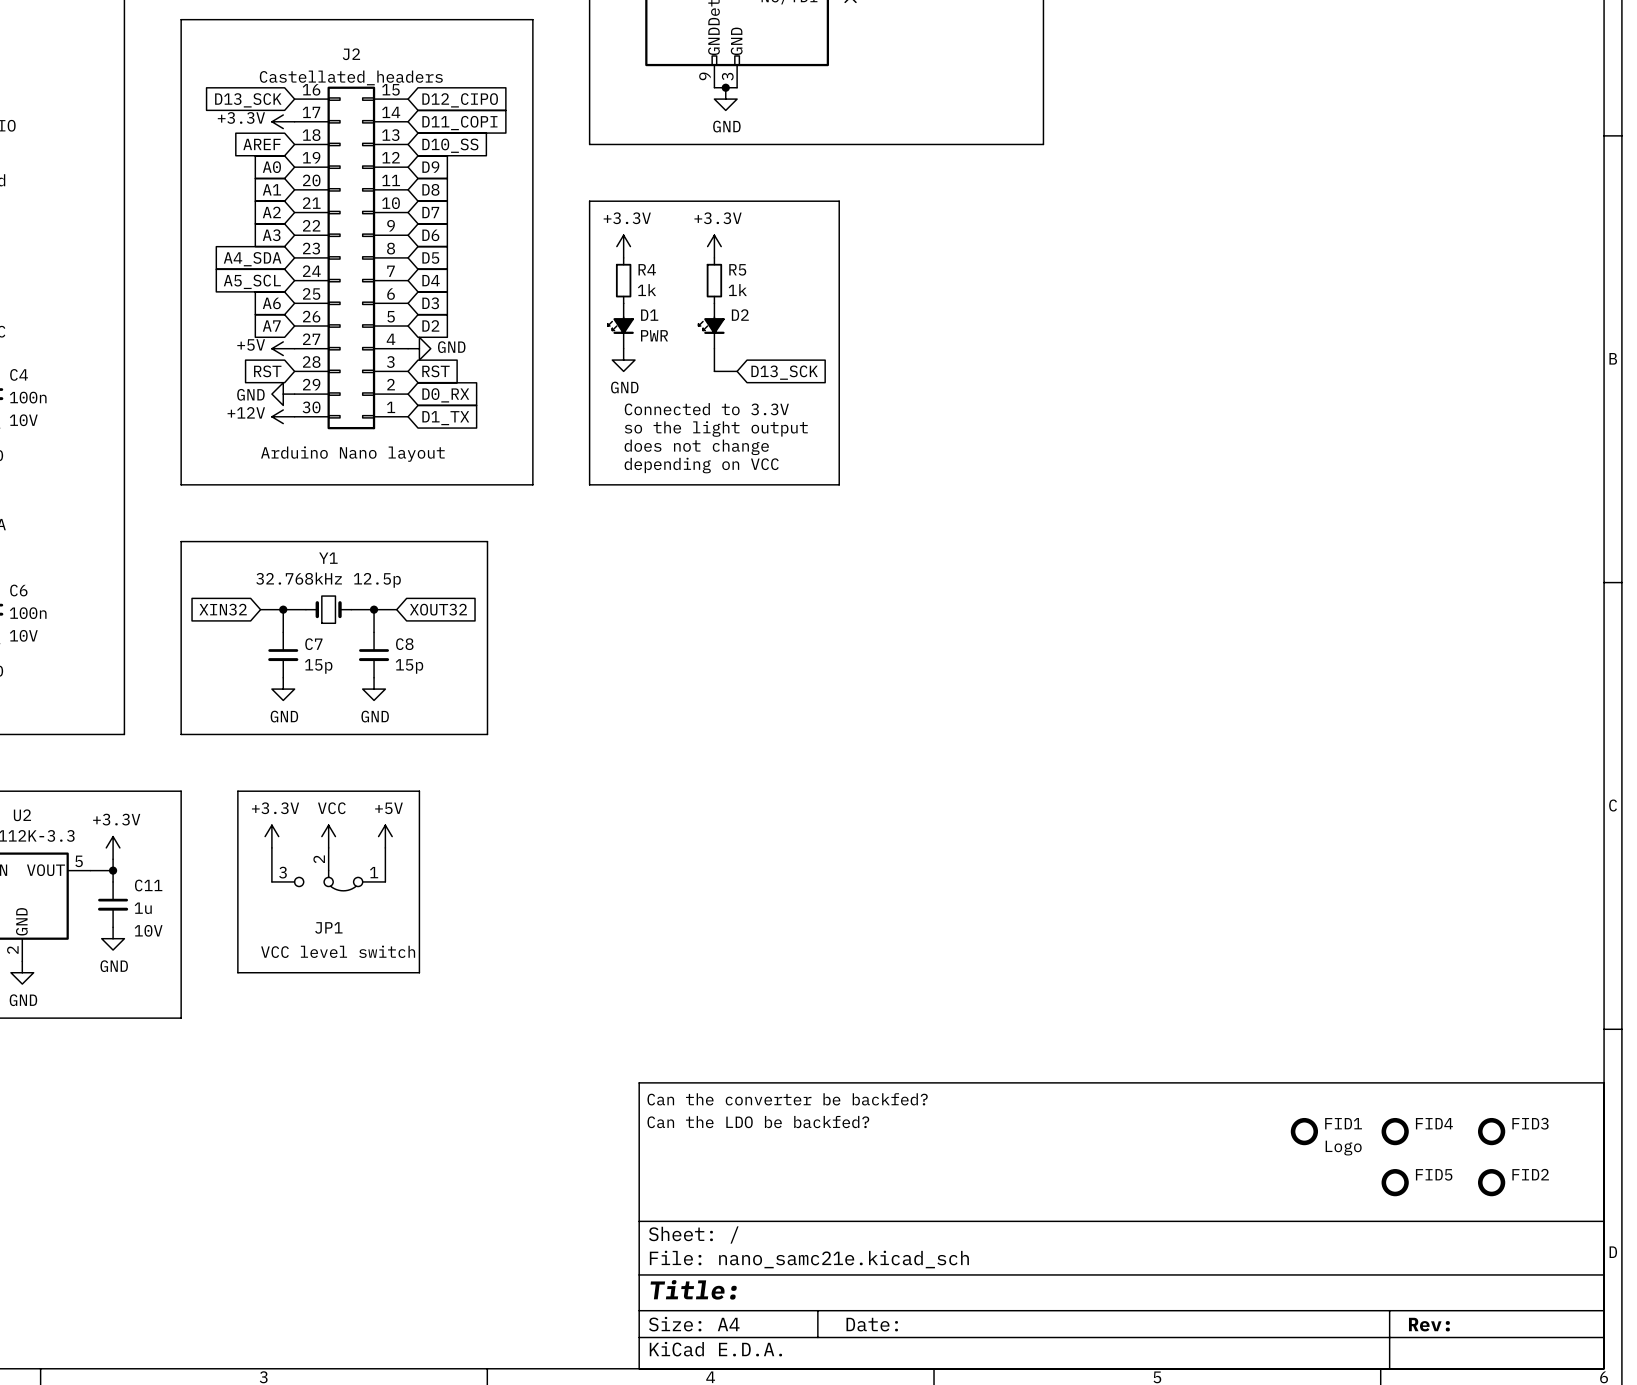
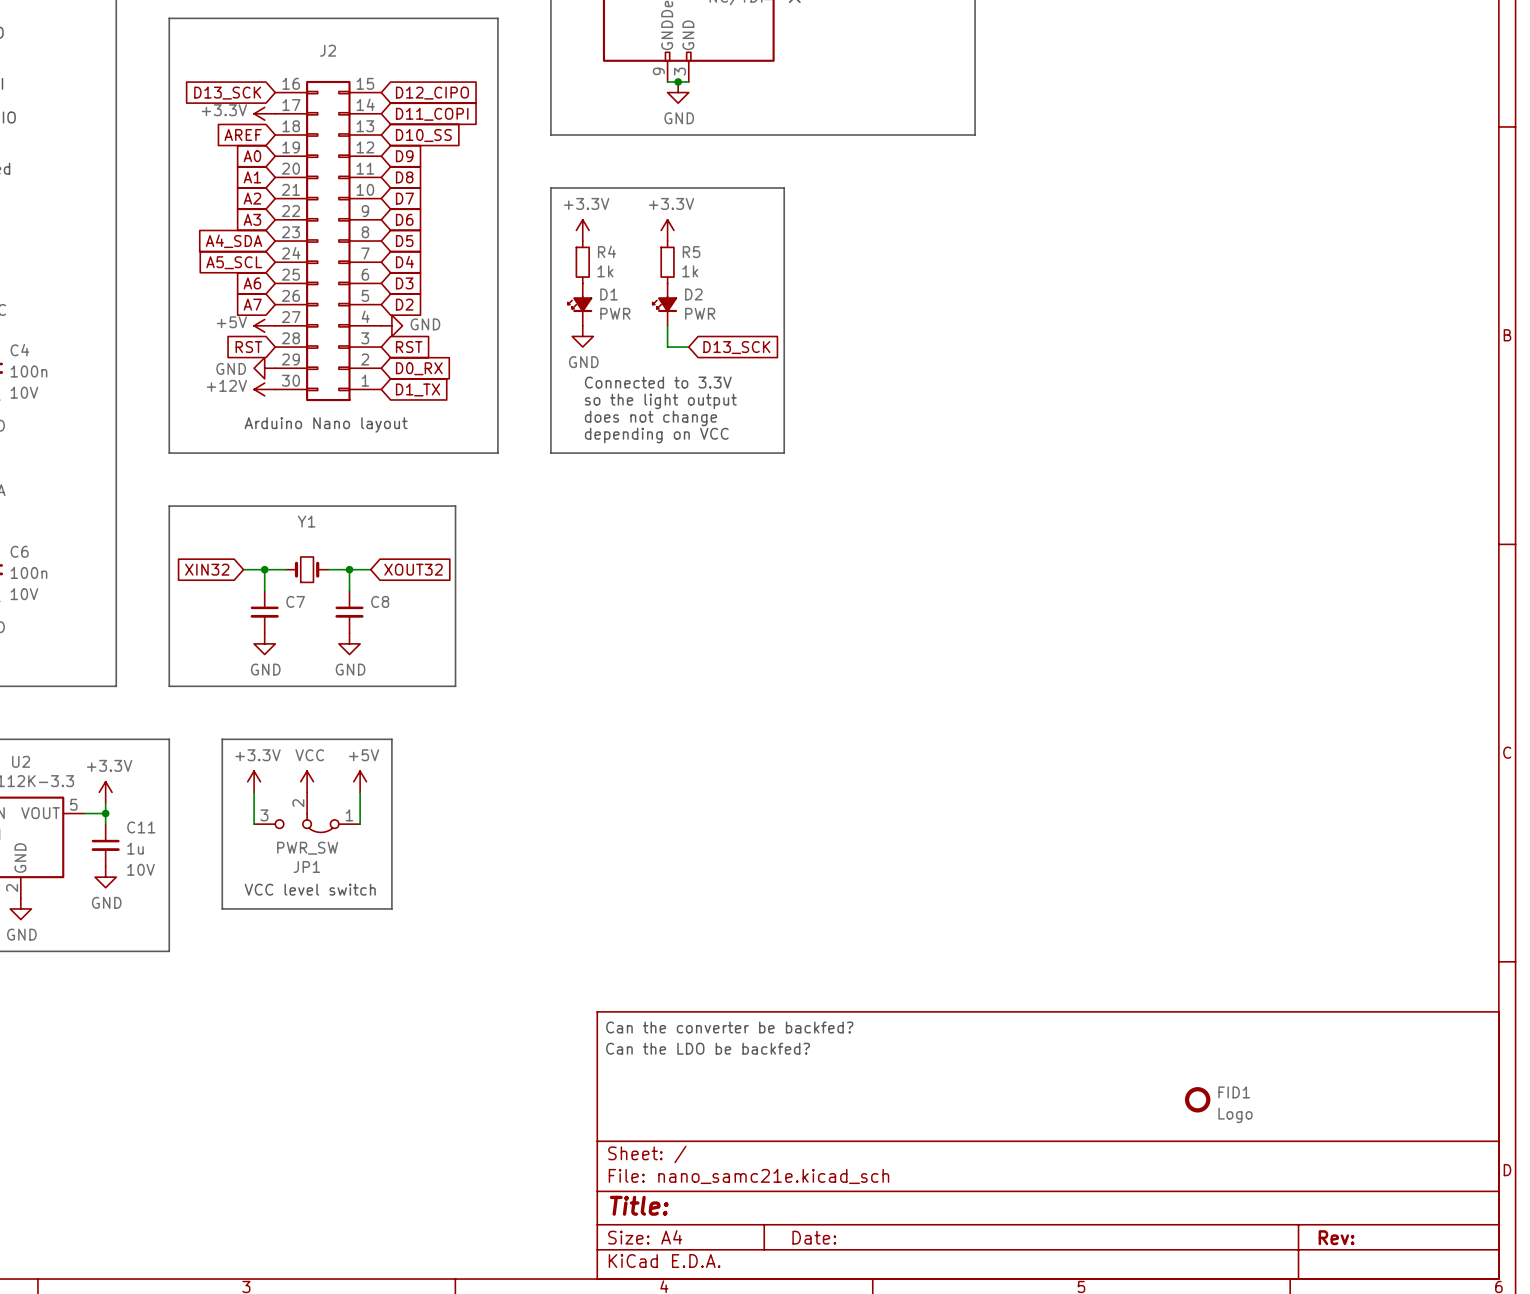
J2 value: Castellated_headers (351, 77) -> none
D2 value: none -> PWR (700, 313)
Y1 value: 32.768kHz 12.5p (328, 580) -> none
C7 value: 15p (318, 666) -> none
C8 value: 15p (409, 666) -> none
JP1 value: none -> PWR_SW (307, 848)
FID1 position: (1304, 1131) -> (1197, 1099)
FID4: (1395, 1131) -> none
FID3: (1491, 1131) -> none
FID5: (1395, 1182) -> none
FID2: (1491, 1182) -> none

